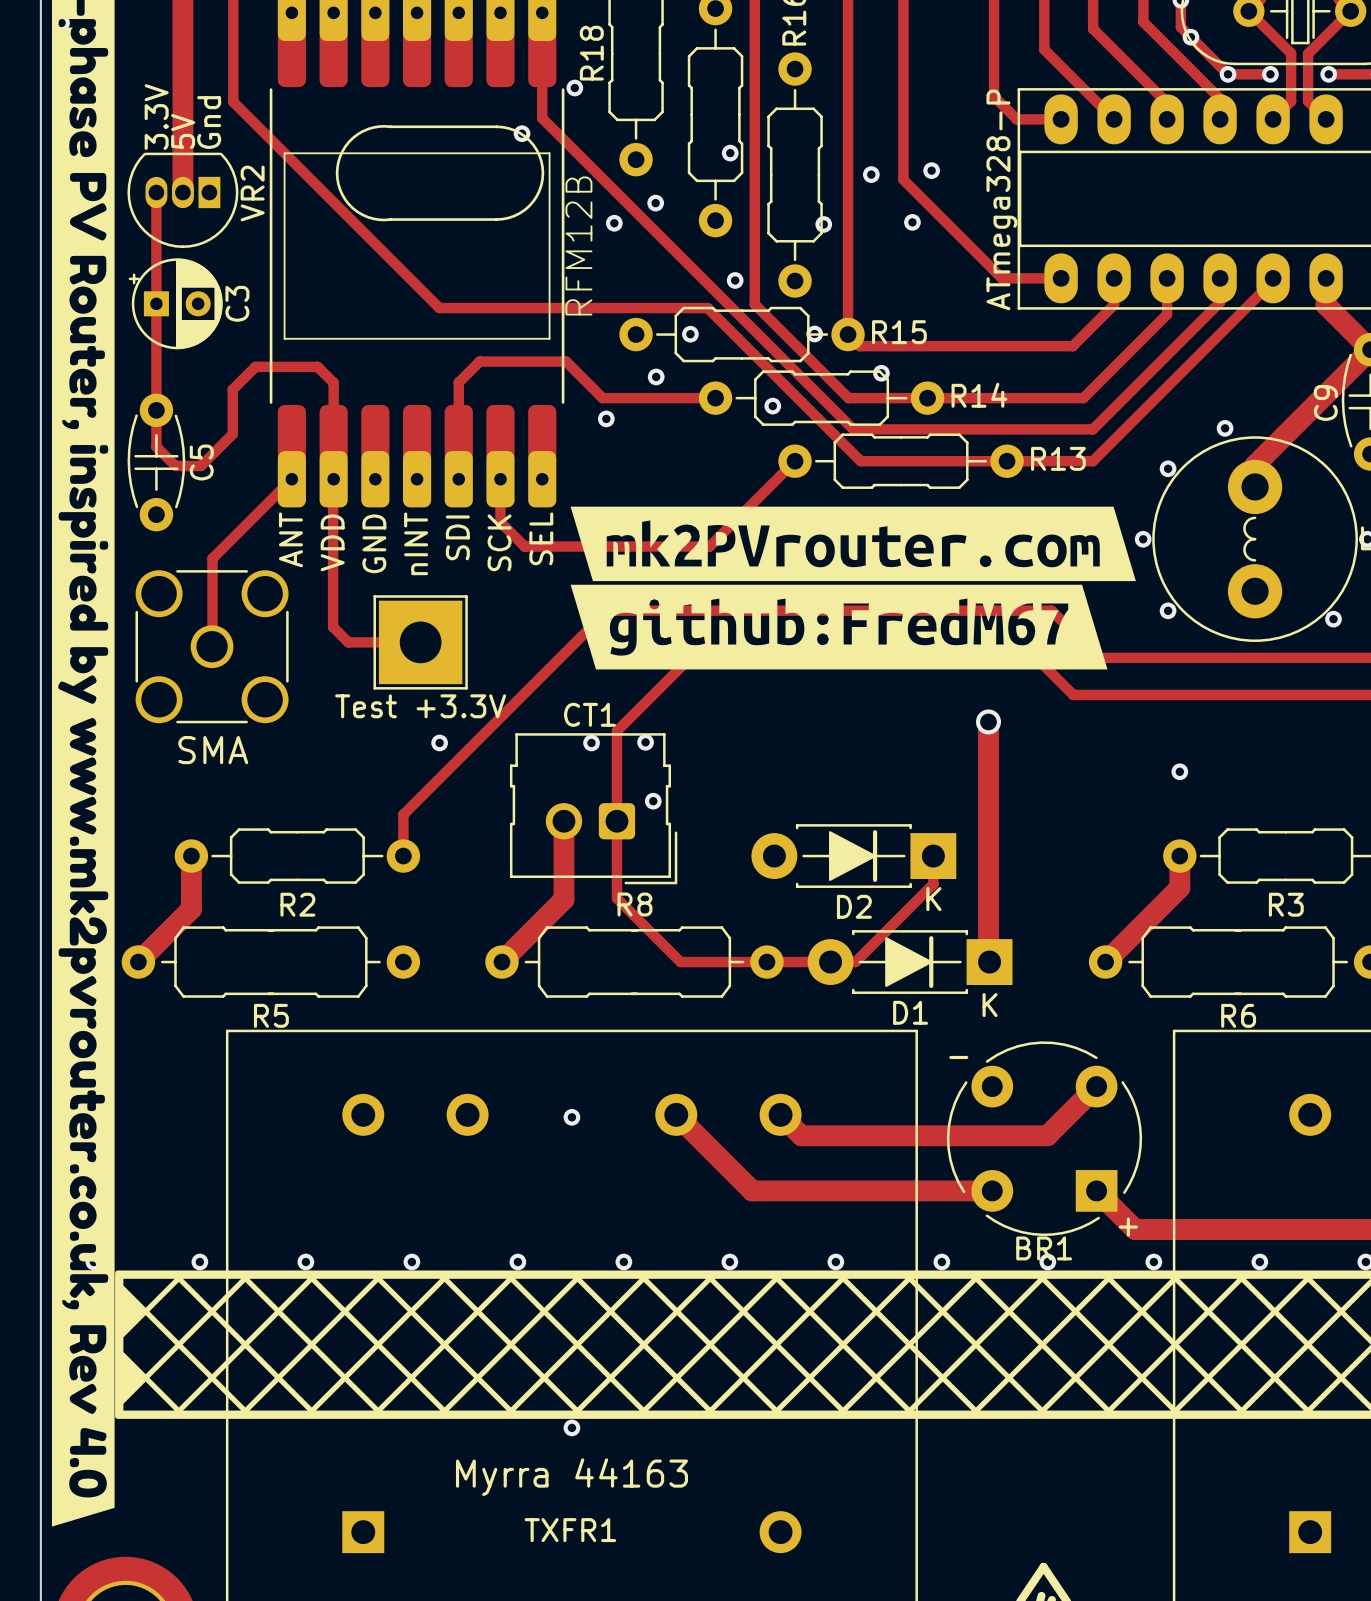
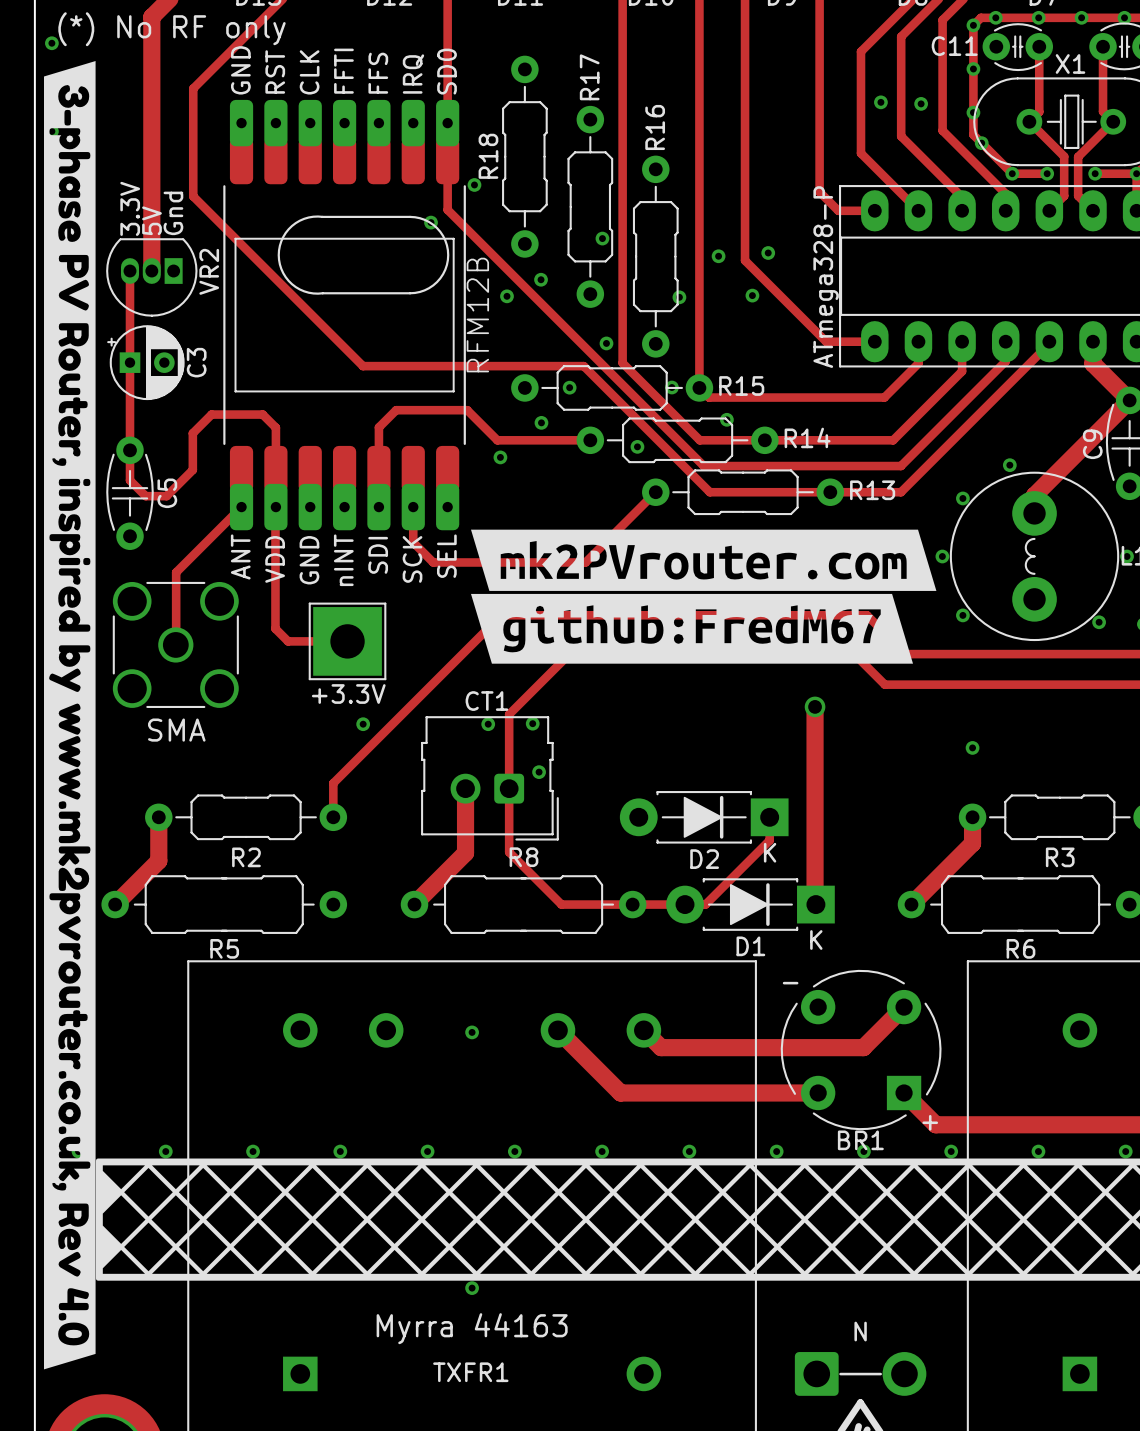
part value: Test +3.3V (420, 706) -> +3.3V (348, 694)
line: none -> (840, 1374) (880, 1374)
part: none -> (860, 1373)

